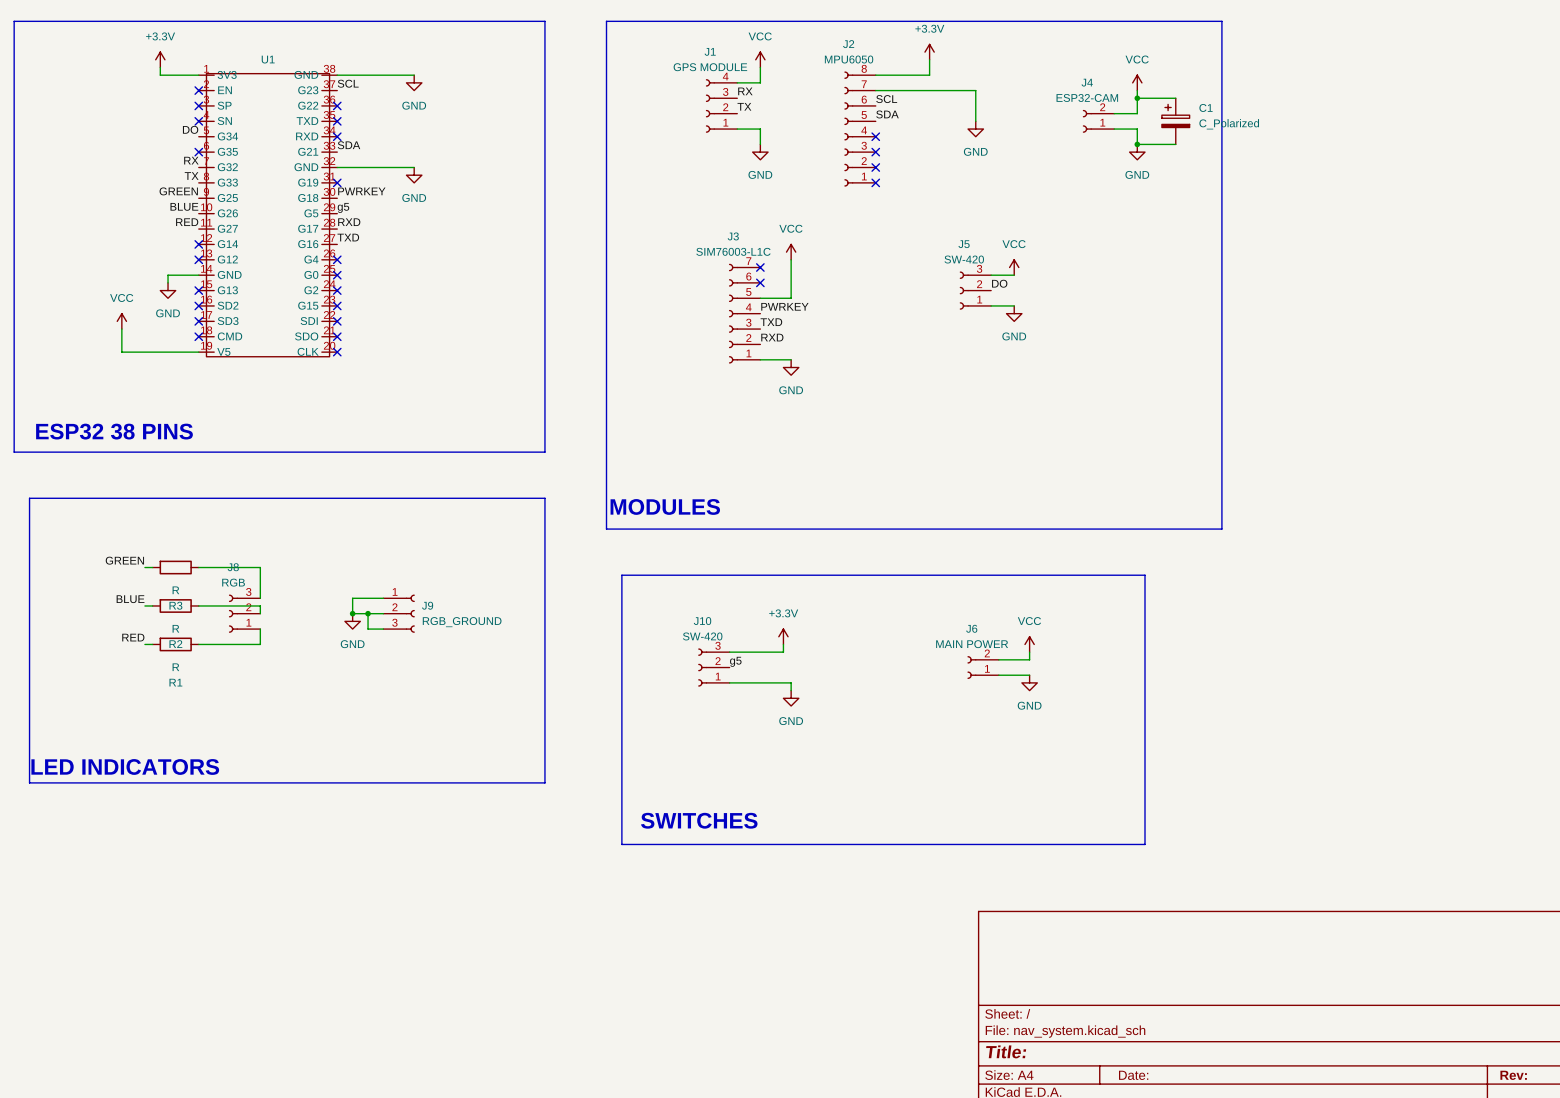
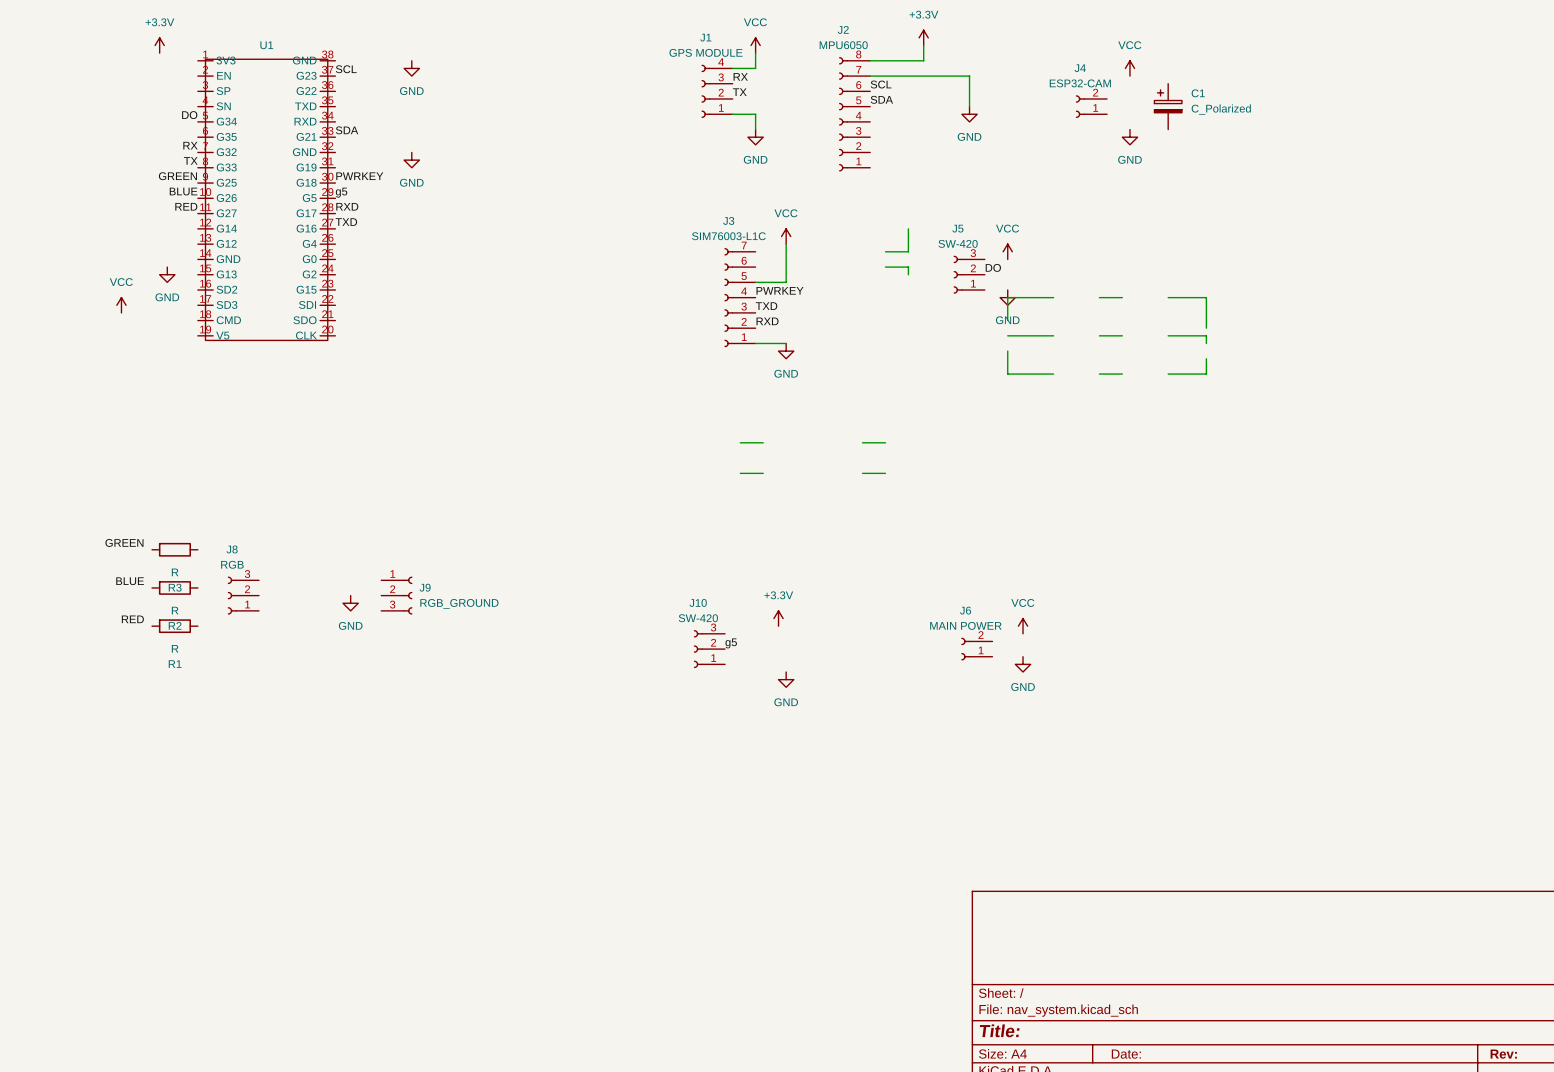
line: (14, 21) (544, 21) (544, 452) (14, 452) (14, 21) -> none
line: (606, 21) (1221, 21) (1221, 529) (606, 529) (606, 21) -> none
wire: (160, 67) (160, 75) (198, 75) -> none
wire: (337, 75) (414, 75) -> none
no-connect mark: (198, 90) -> none
wire: (1137, 90) (1137, 113) (1114, 113) -> none
wire: (1137, 98) (1175, 98) -> none
junction: (1137, 98) -> none
no-connect mark: (198, 105) -> none
no-connect mark: (337, 105) -> none
no-connect mark: (198, 121) -> none
no-connect mark: (337, 121) -> none
wire: (1114, 129) (1137, 129) (1137, 144) (1175, 144) -> none
no-connect mark: (337, 136) -> none
no-connect mark: (875, 136) -> none
junction: (1137, 144) -> none
no-connect mark: (198, 152) -> none
no-connect mark: (875, 152) -> none
wire: (337, 167) (414, 167) -> none
no-connect mark: (875, 167) -> none
no-connect mark: (337, 182) -> none
no-connect mark: (875, 182) -> none
no-connect mark: (198, 244) -> none
wire: none -> (908, 228) (908, 251) (885, 251)
no-connect mark: (198, 259) -> none
no-connect mark: (337, 259) -> none
no-connect mark: (760, 267) -> none
wire: (198, 275) (168, 275) (168, 282) -> none
no-connect mark: (337, 275) -> none
wire: (991, 275) (1014, 275) -> (1099, 335) (1122, 335)
no-connect mark: (760, 282) -> none
wire: none -> (885, 267) (908, 267) (908, 274)
no-connect mark: (198, 290) -> none
no-connect mark: (337, 290) -> none
no-connect mark: (198, 305) -> none
no-connect mark: (337, 305) -> none
wire: (991, 305) (1014, 305) -> (1099, 297) (1122, 297)
wire: none -> (1053, 297) (1007, 297) (1007, 320)
wire: none -> (1168, 297) (1206, 297) (1206, 328)
no-connect mark: (198, 321) -> none
no-connect mark: (337, 321) -> none
wire: (121, 329) (121, 352) (198, 352) -> none
no-connect mark: (198, 336) -> none
no-connect mark: (337, 336) -> none
no-connect mark: (337, 352) -> none
wire: none -> (1007, 335) (1053, 335)
wire: none -> (1168, 335) (1206, 335) (1206, 343)
wire: none -> (1007, 351) (1007, 374) (1053, 374)
wire: none -> (1206, 358) (1206, 374) (1168, 374)
wire: none -> (1099, 374) (1122, 374)
text: ESP32 38 PINS (114, 431) -> none
wire: none -> (740, 442) (763, 442)
wire: none -> (862, 442) (885, 442)
wire: none -> (740, 473) (763, 473)
wire: none -> (862, 473) (885, 473)
line: (29, 498) (544, 498) (544, 782) (29, 782) (29, 498) -> none
text: MODULES (665, 506) -> none
wire: (144, 567) (152, 567) -> none
wire: (198, 567) (260, 567) (260, 598) -> none
line: (621, 575) (1145, 575) (1145, 844) (621, 844) (621, 575) -> none
wire: (383, 598) (352, 598) (352, 613) (383, 613) -> none
wire: (144, 605) (152, 605) -> none
wire: (198, 605) (260, 605) (260, 613) -> none
junction: (352, 613) -> none
wire: (368, 613) (368, 629) (383, 629) -> none
junction: (368, 613) -> none
wire: (260, 629) (260, 644) (198, 644) -> none
wire: (144, 644) (152, 644) -> none
wire: (783, 644) (783, 652) (729, 652) -> none
wire: (1029, 652) (1029, 659) (998, 659) -> none
wire: (998, 675) (1029, 675) -> none
wire: (729, 682) (791, 682) (791, 690) -> none
text: LED INDICATORS (125, 766) -> none
text: SWITCHES (699, 820) -> none

